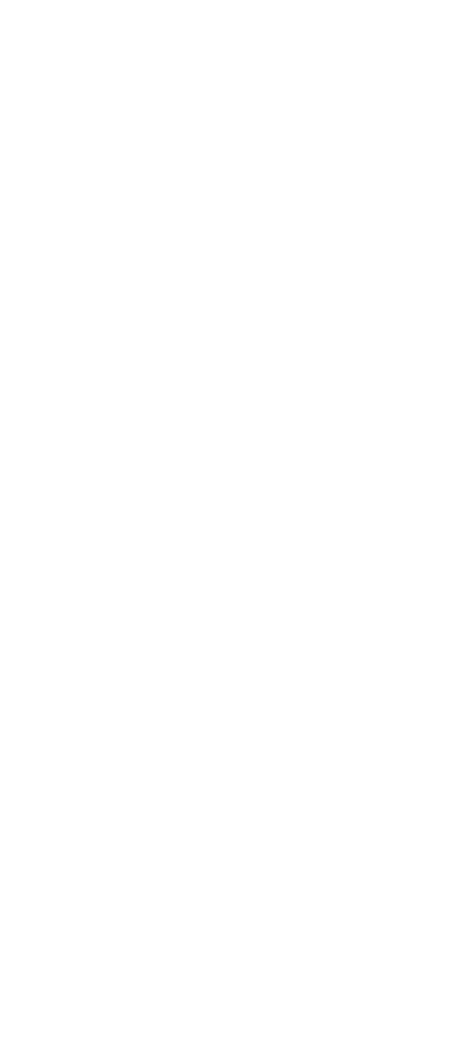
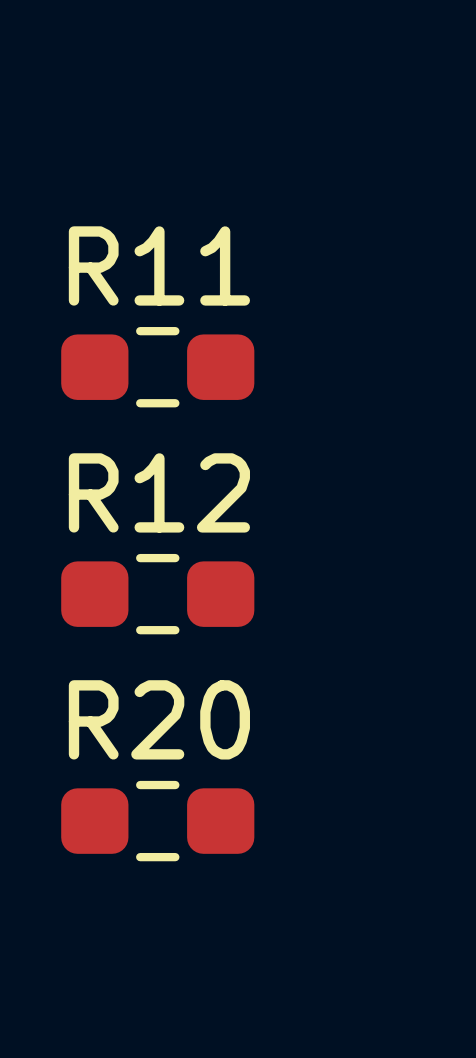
R11: none -> (157, 367)
R12: none -> (157, 594)
R20: none -> (157, 821)

